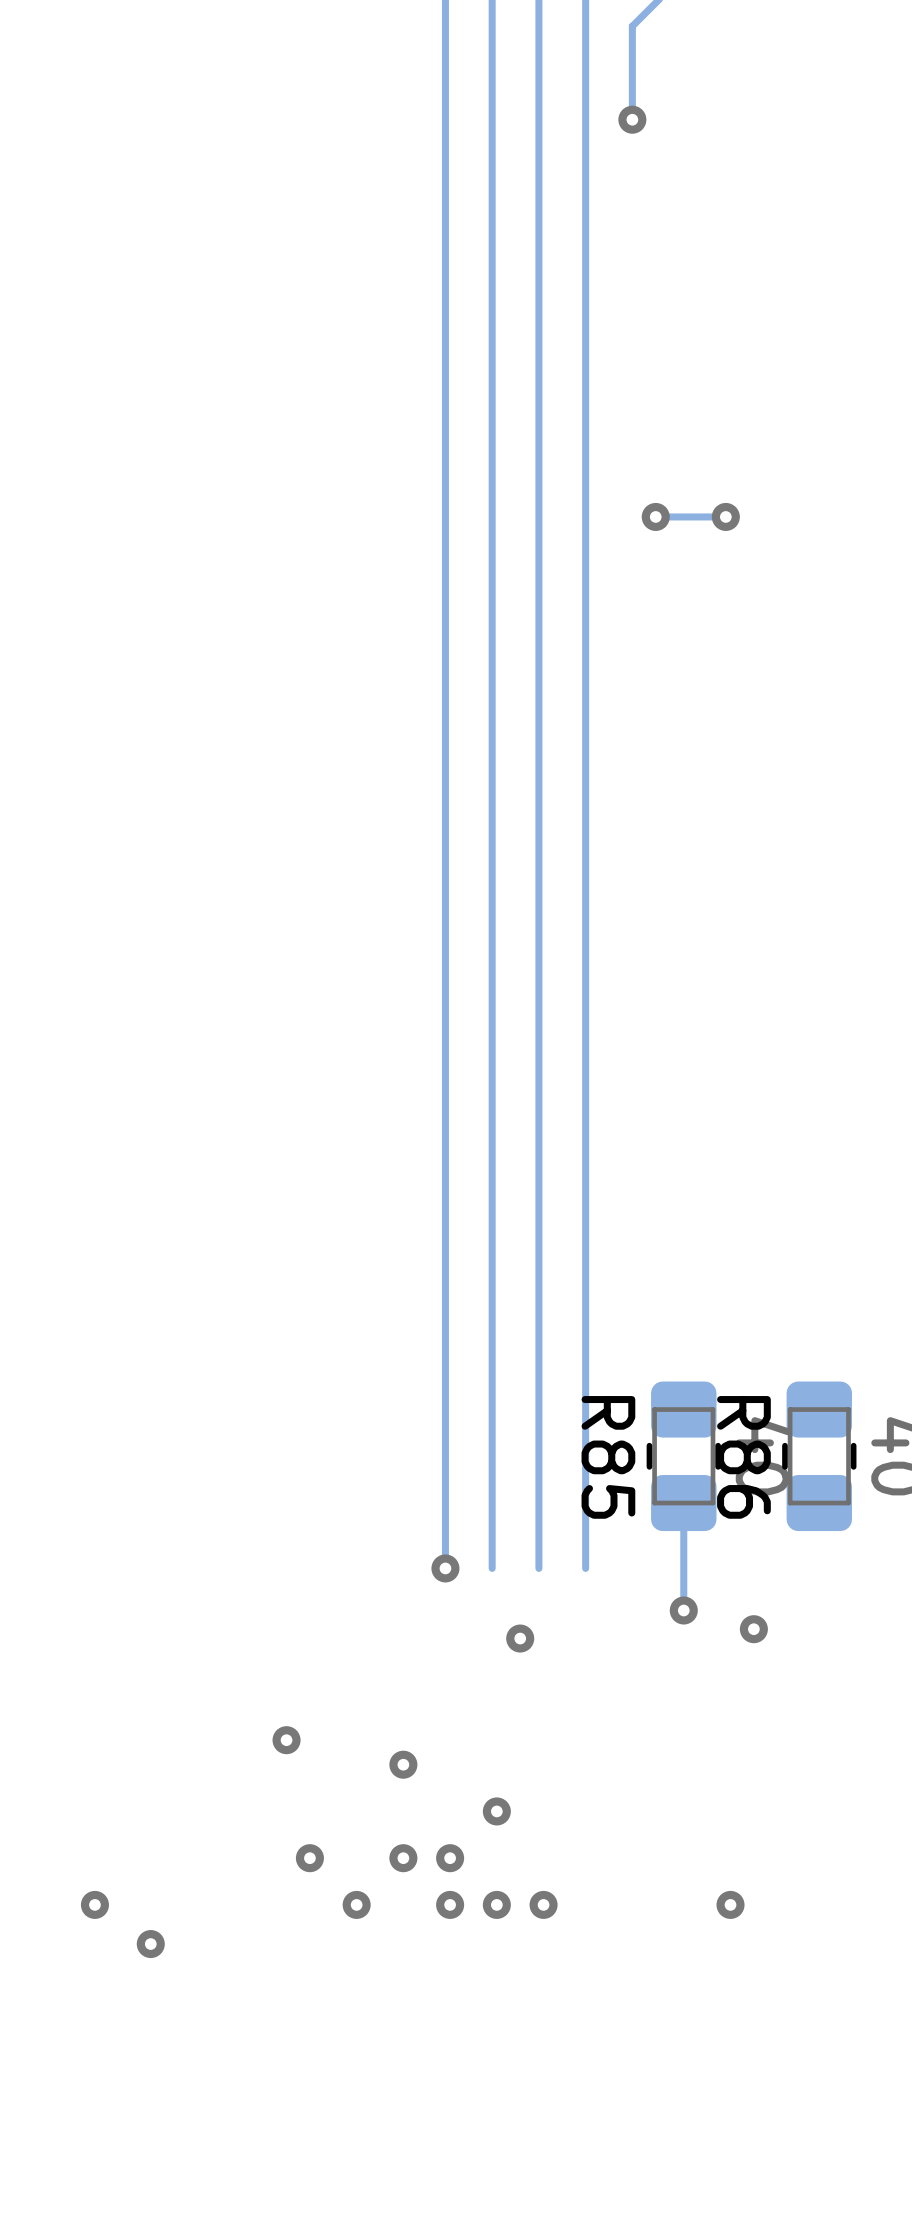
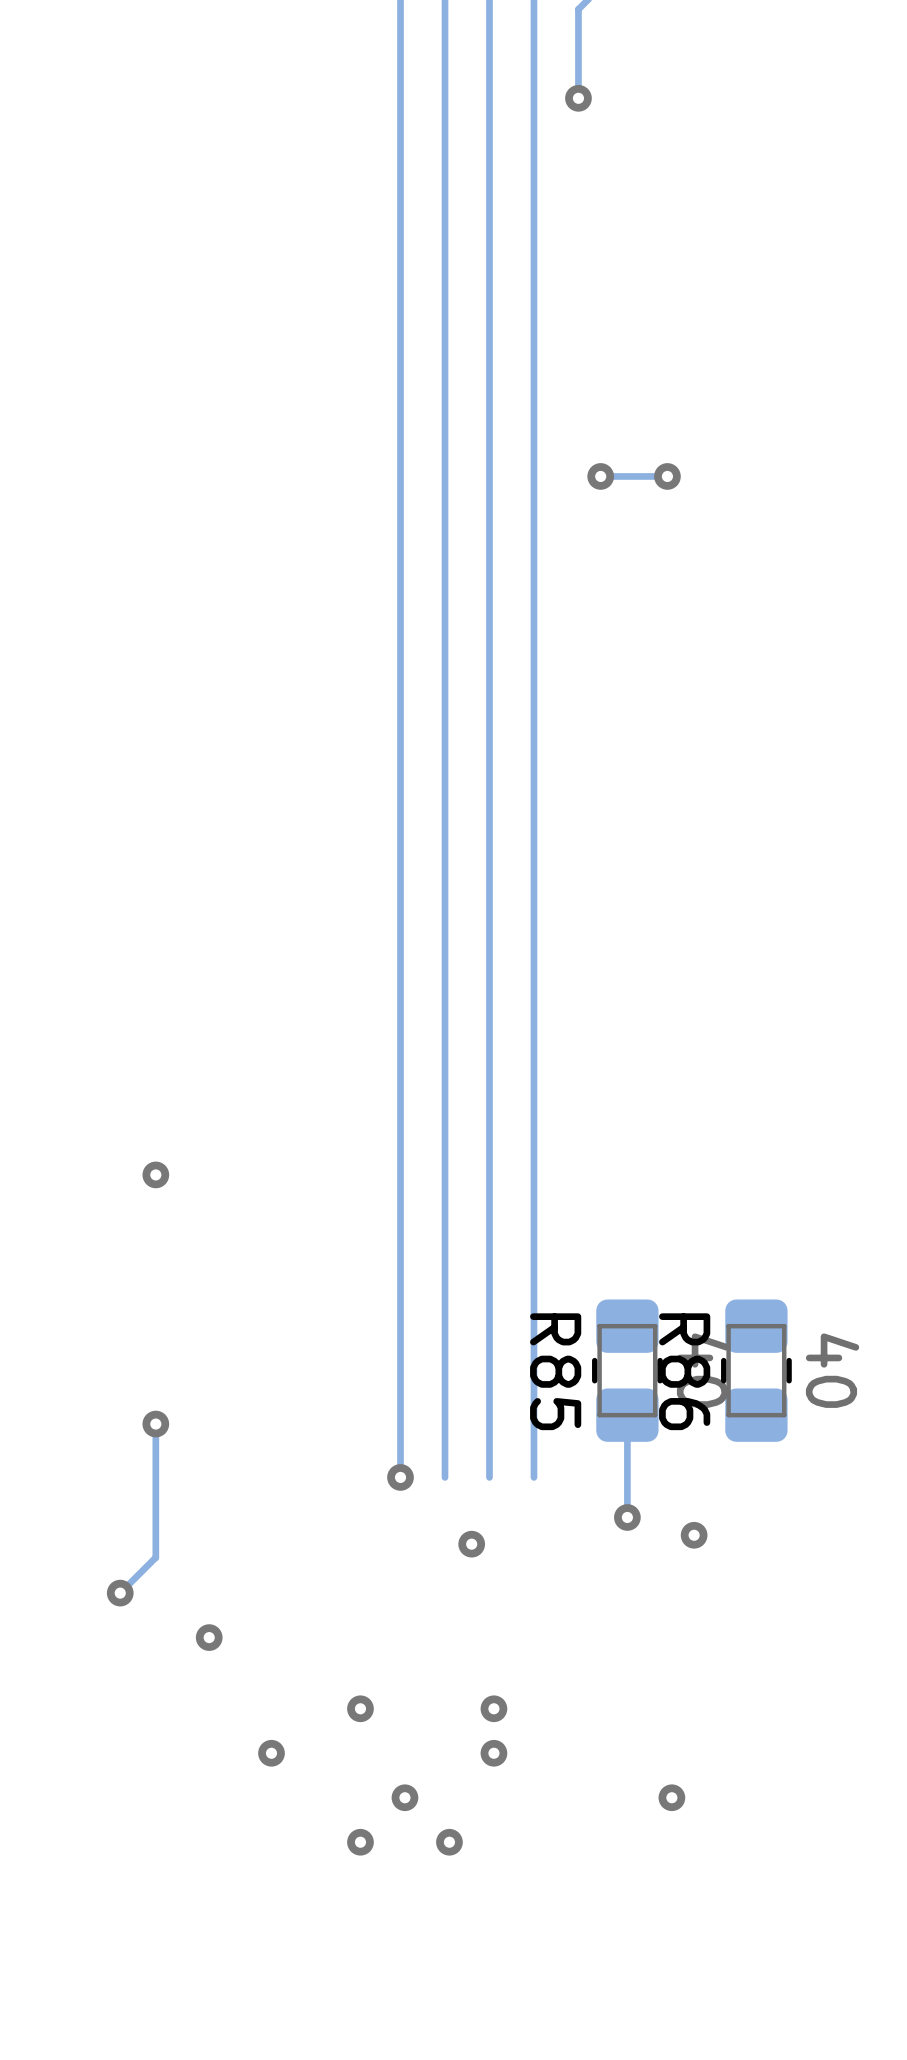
via: none -> (155, 1174)
track: none -> (155, 1424) (155, 1557) (120, 1593)
via: none -> (155, 1424)
via: none -> (120, 1593)
via position: (286, 1740) -> (209, 1637)
via: (403, 1764) -> none
via: none -> (360, 1708)
via: (496, 1811) -> none
via: none -> (493, 1708)
via: (403, 1858) -> none
via: (450, 1858) -> none
via: none -> (493, 1753)
via: (94, 1904) -> none
via: (356, 1904) -> none
via: (496, 1904) -> none
via: (543, 1904) -> none
via: (150, 1944) -> none
via: none -> (360, 1842)
via: none -> (449, 1842)

